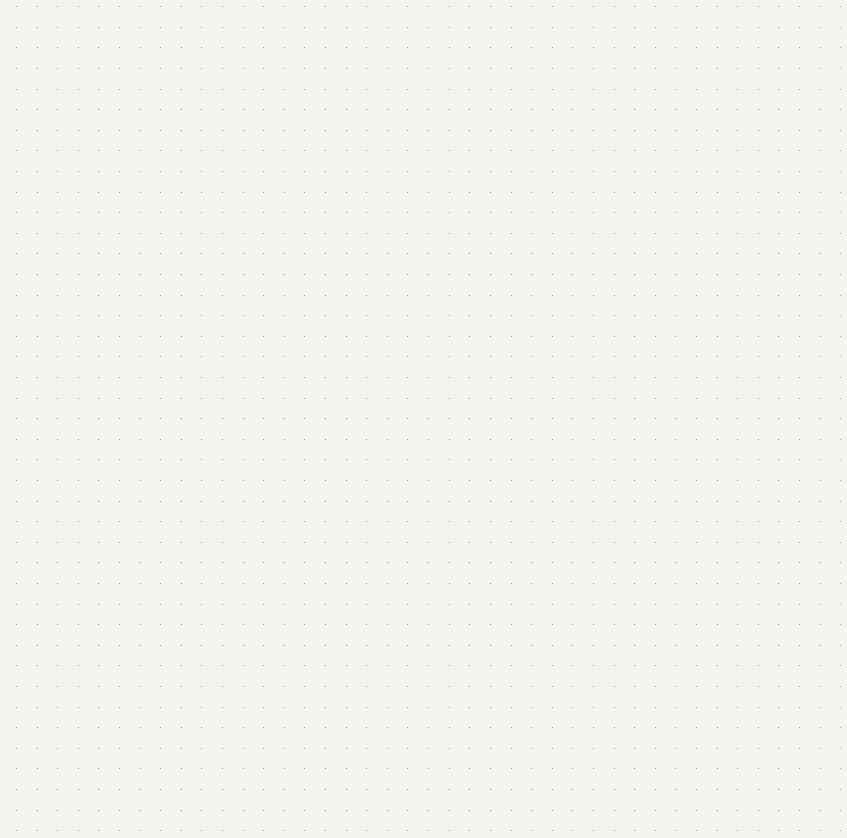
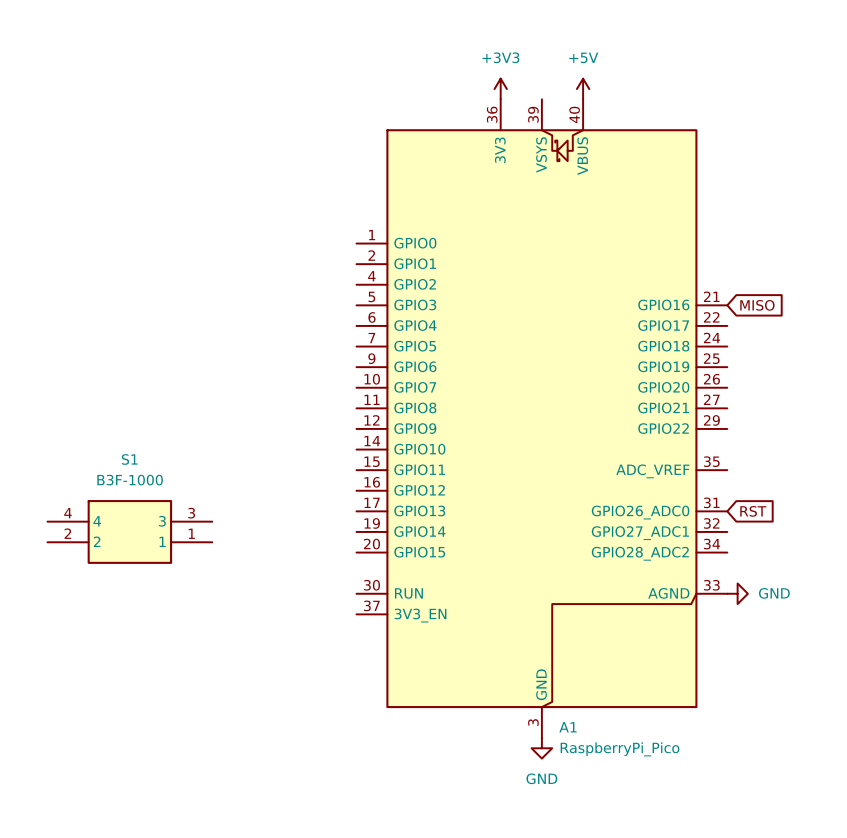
power symbol: none -> +3V3 (500, 89)
power symbol: none -> +5V (583, 89)
global label: none -> MISO (757, 305)
A1: none -> RaspberryPi_Pico (541, 418)
global label: none -> RST (753, 511)
S1: none -> B3F-1000 (129, 531)
power symbol: none -> GND (737, 593)
power symbol: none -> GND (541, 748)

